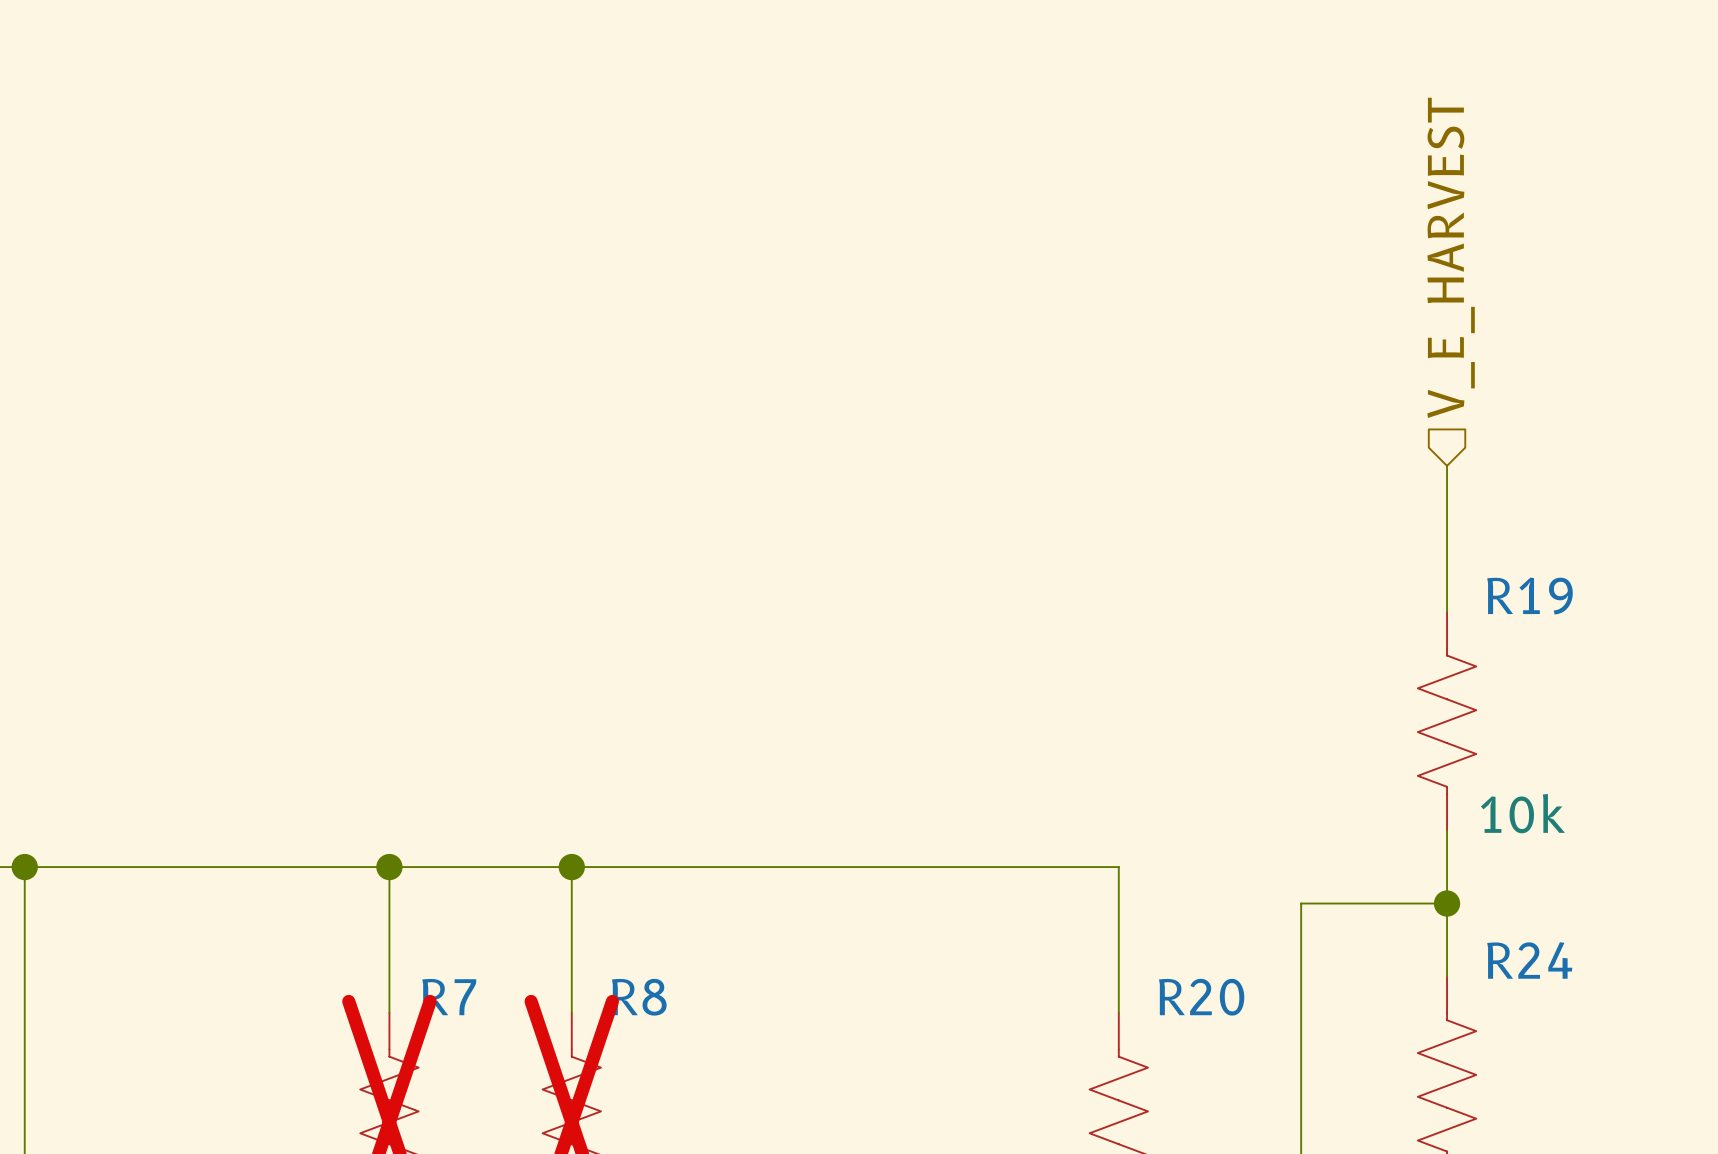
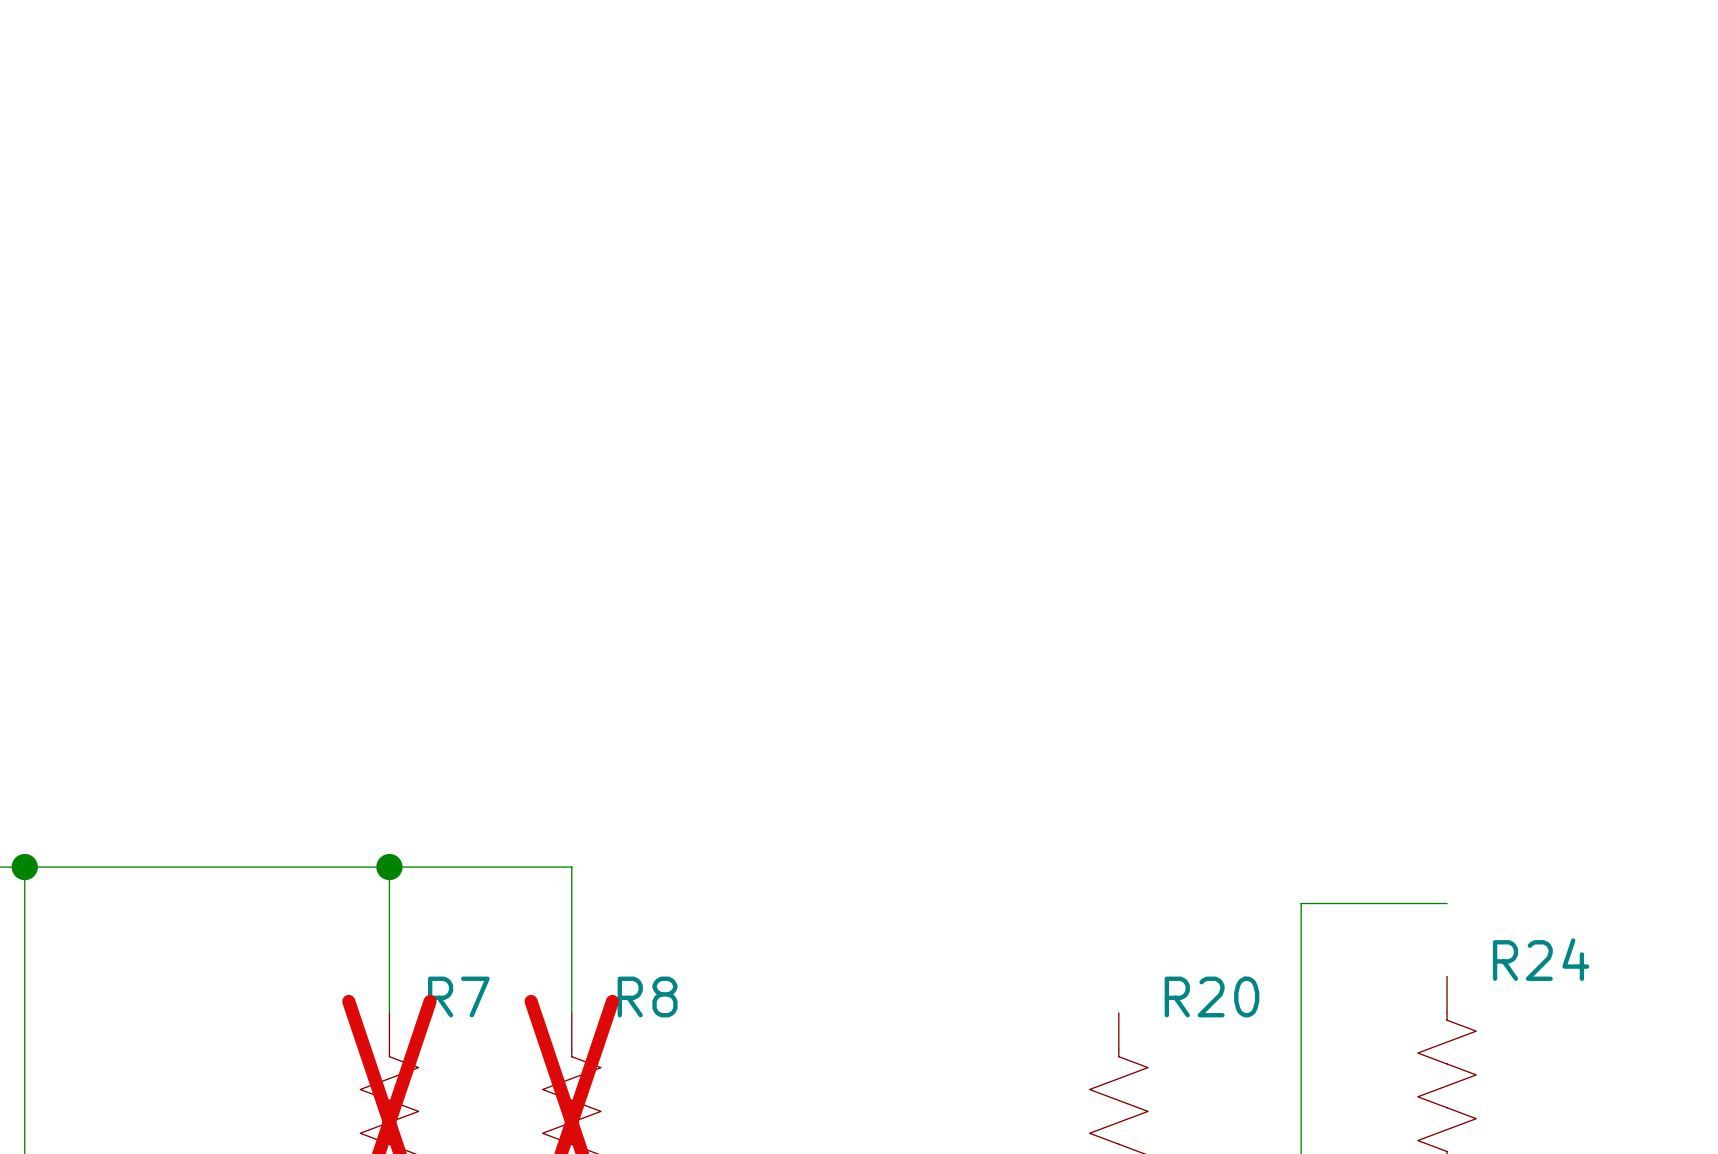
hierarchical label: V_E_HARVEST (1451, 257) -> none
wire: (1447, 465) (1447, 611) -> none
R19: 10k (1447, 721) -> none
wire: (1447, 830) (1447, 976) -> none
wire: (571, 867) (1118, 867) (1118, 1012) -> none
junction: (571, 867) -> none
junction: (1447, 903) -> none

